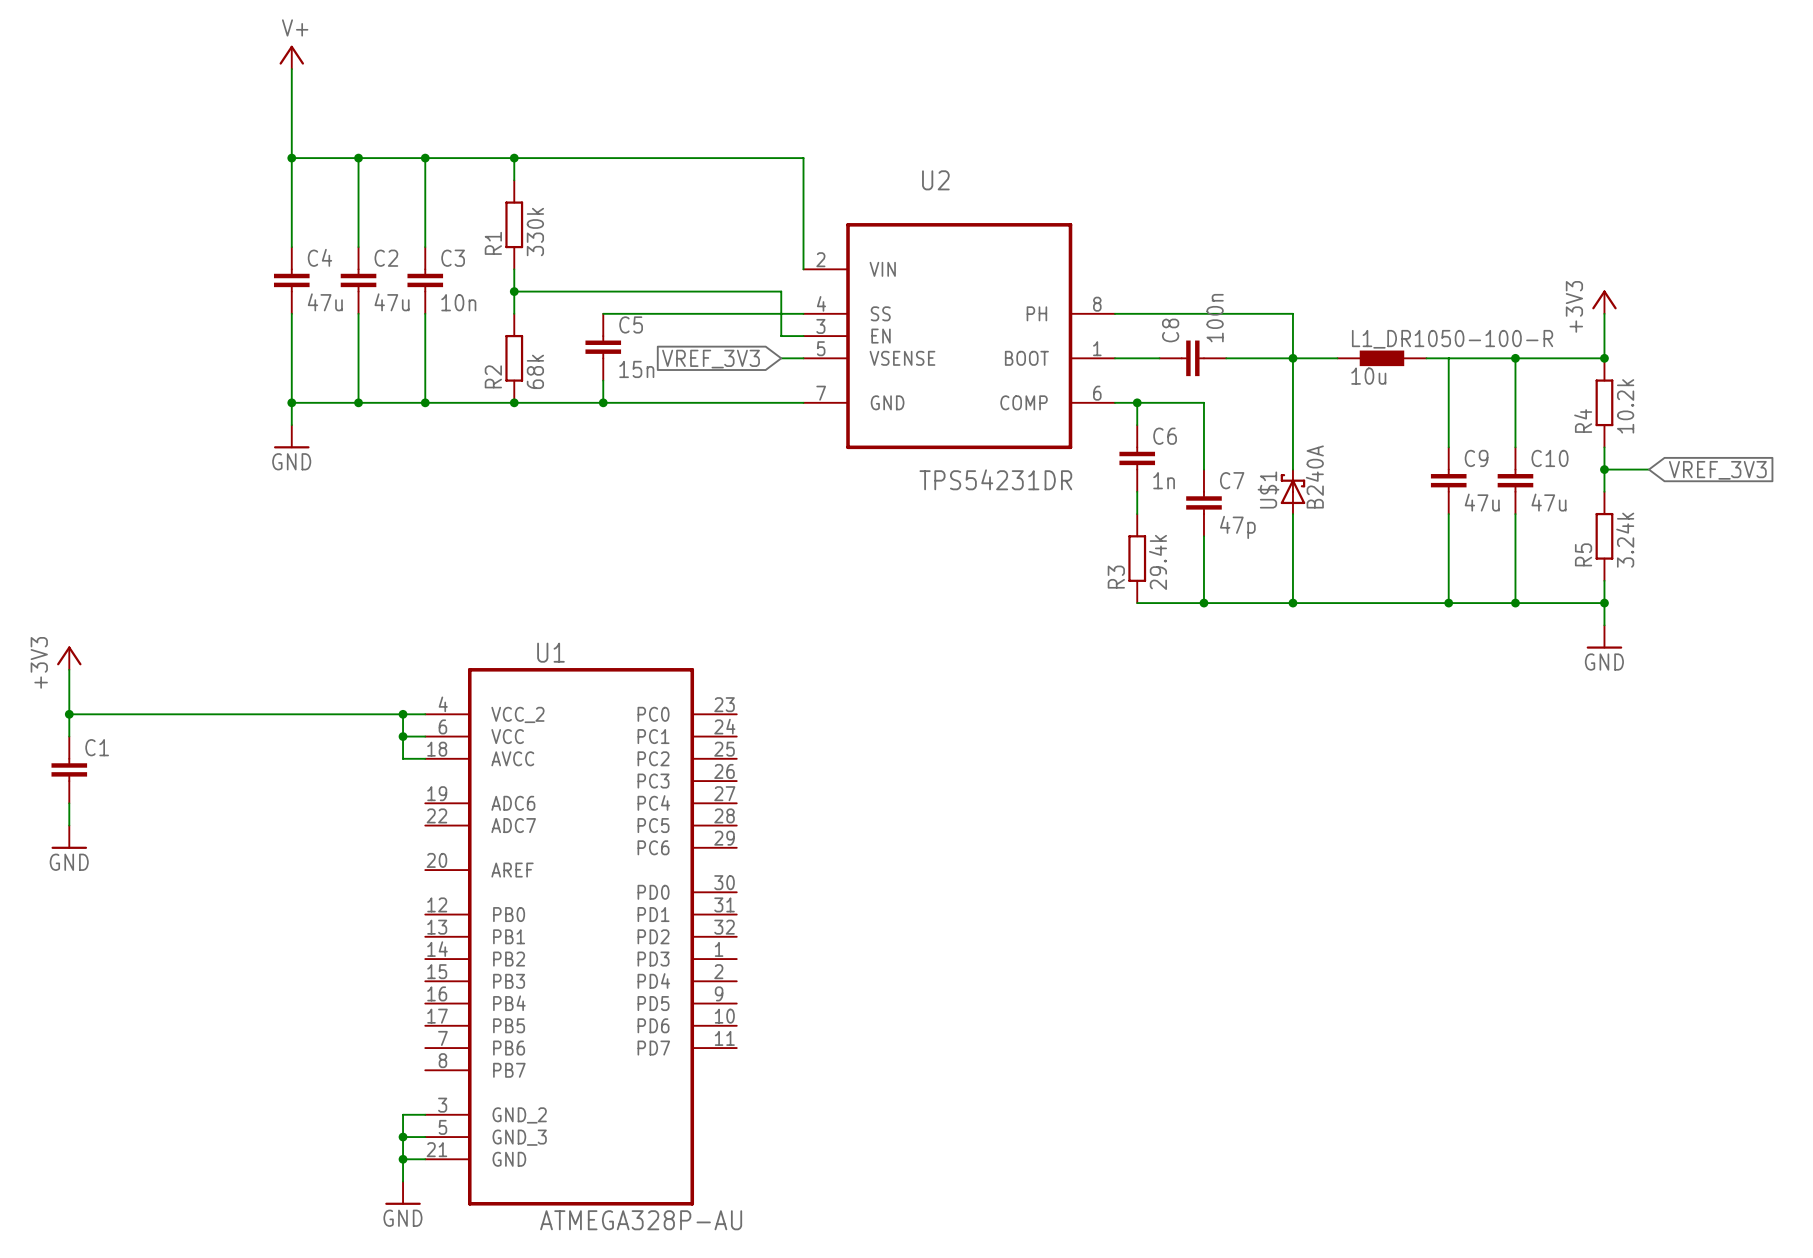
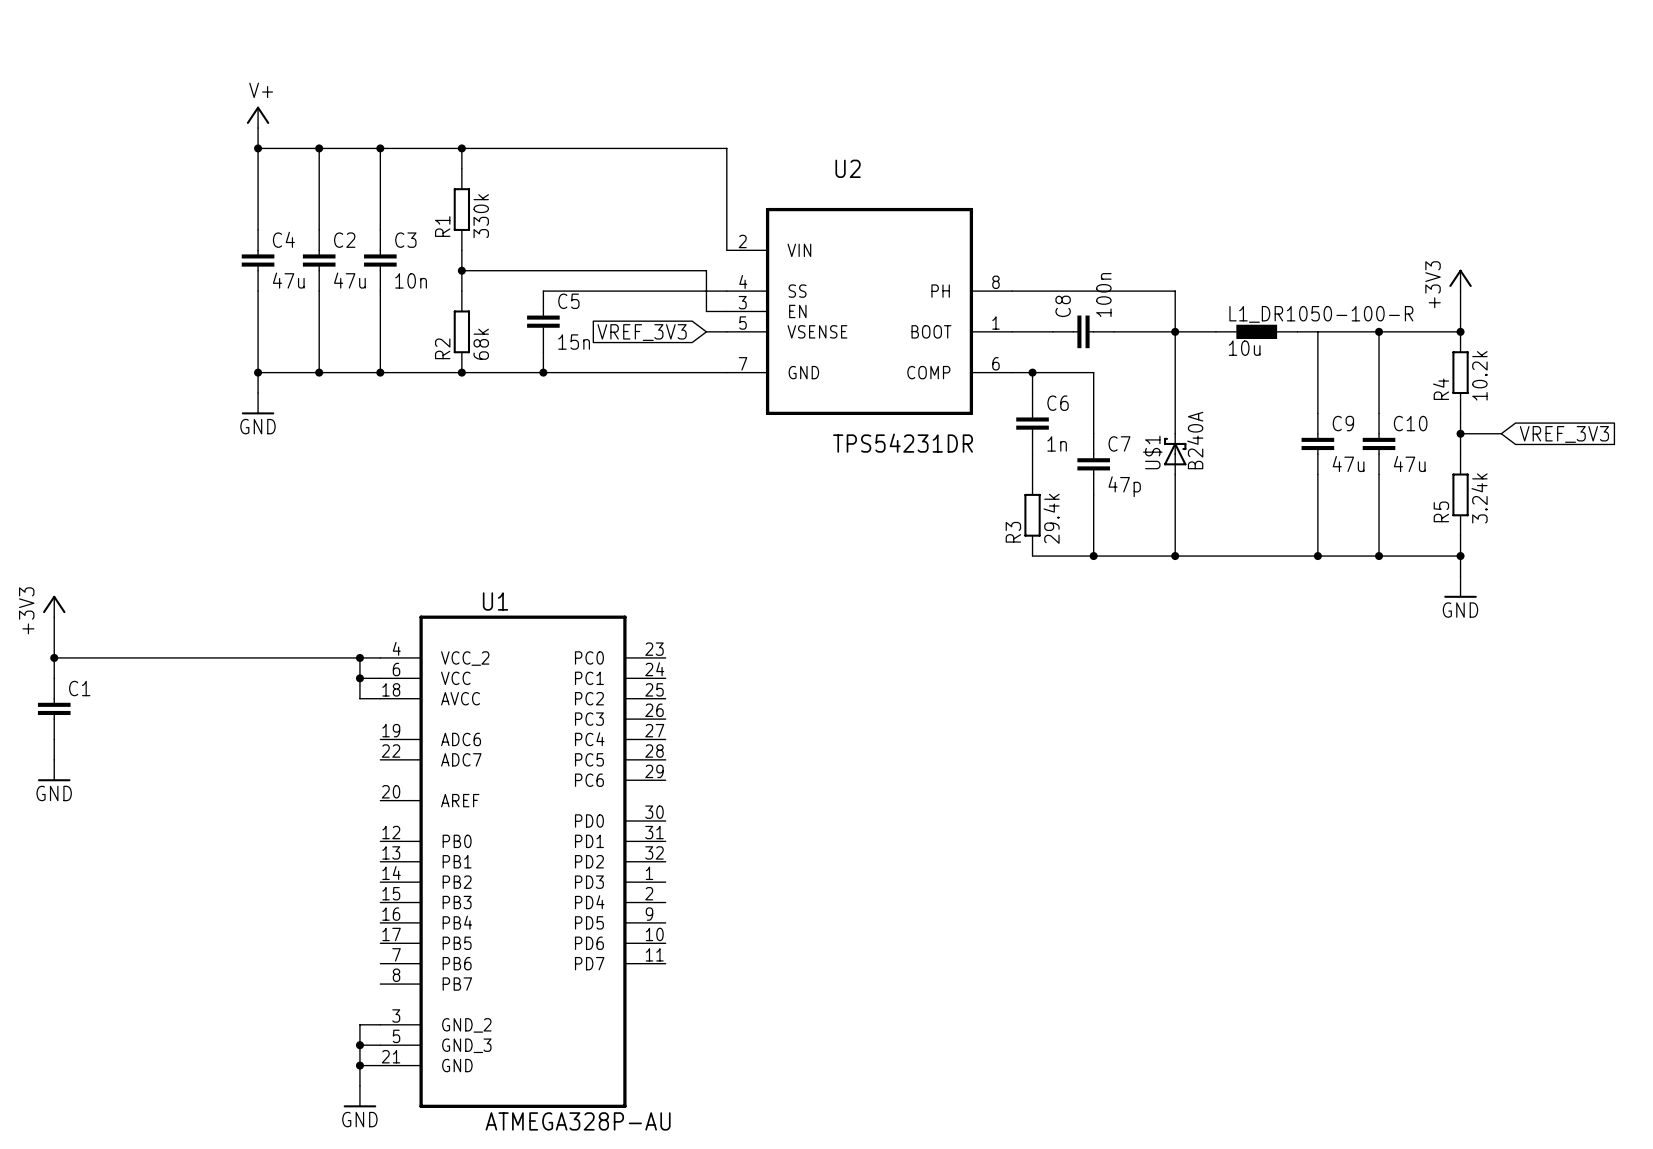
power symbol position: V+ (291, 57) -> V+ (258, 117)
wire: (291, 69) (291, 135) -> none

